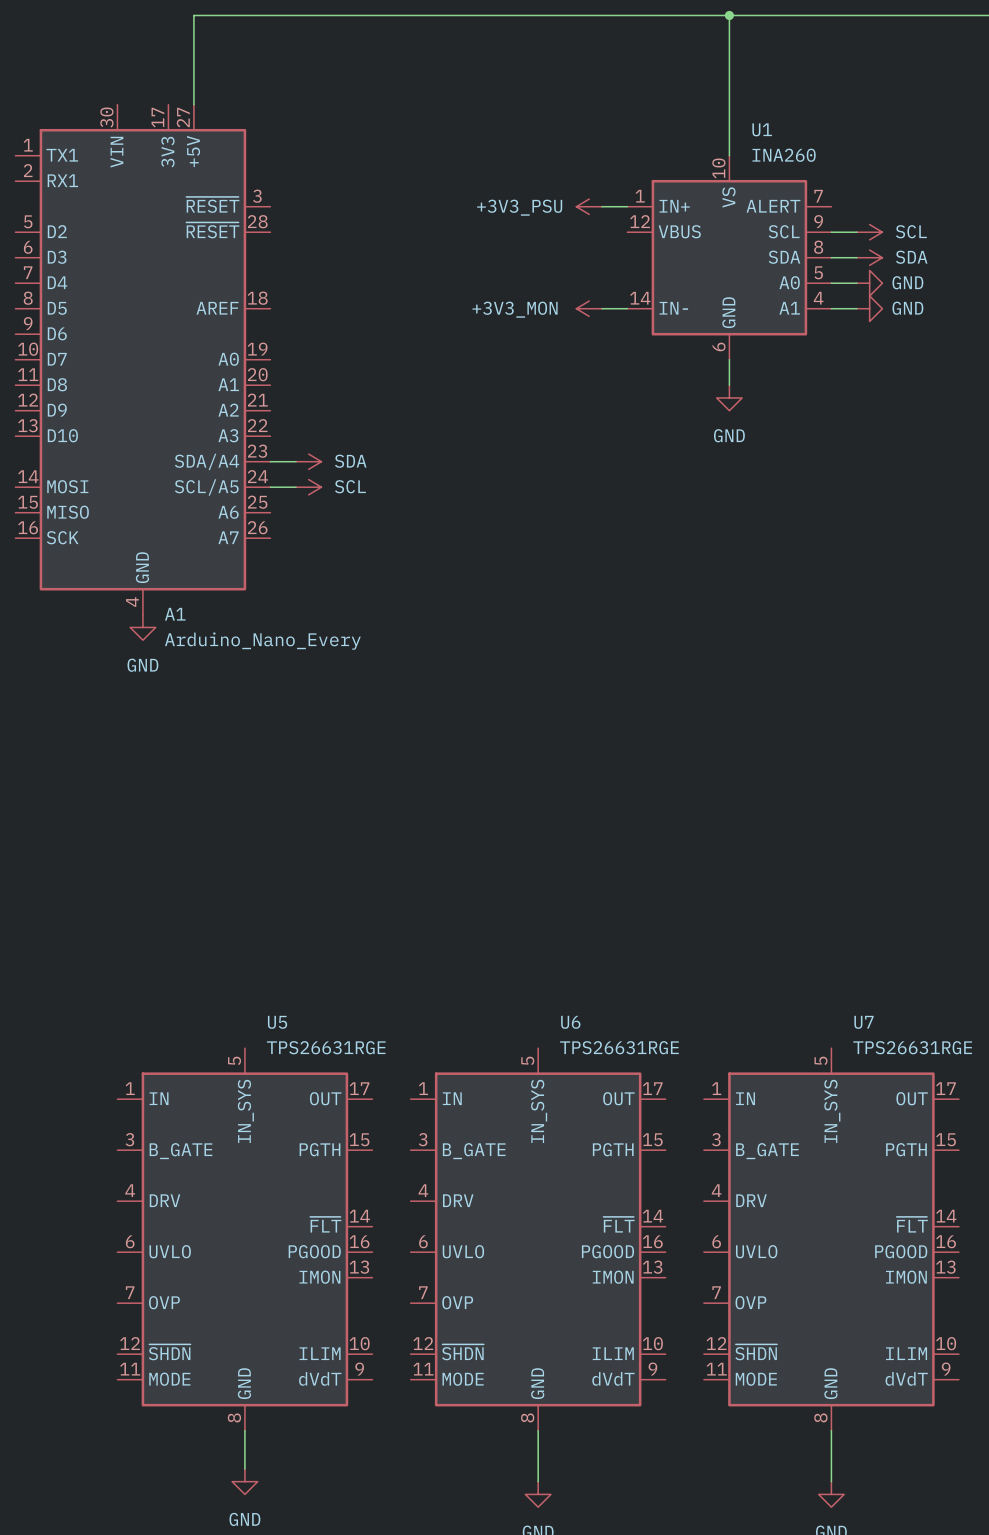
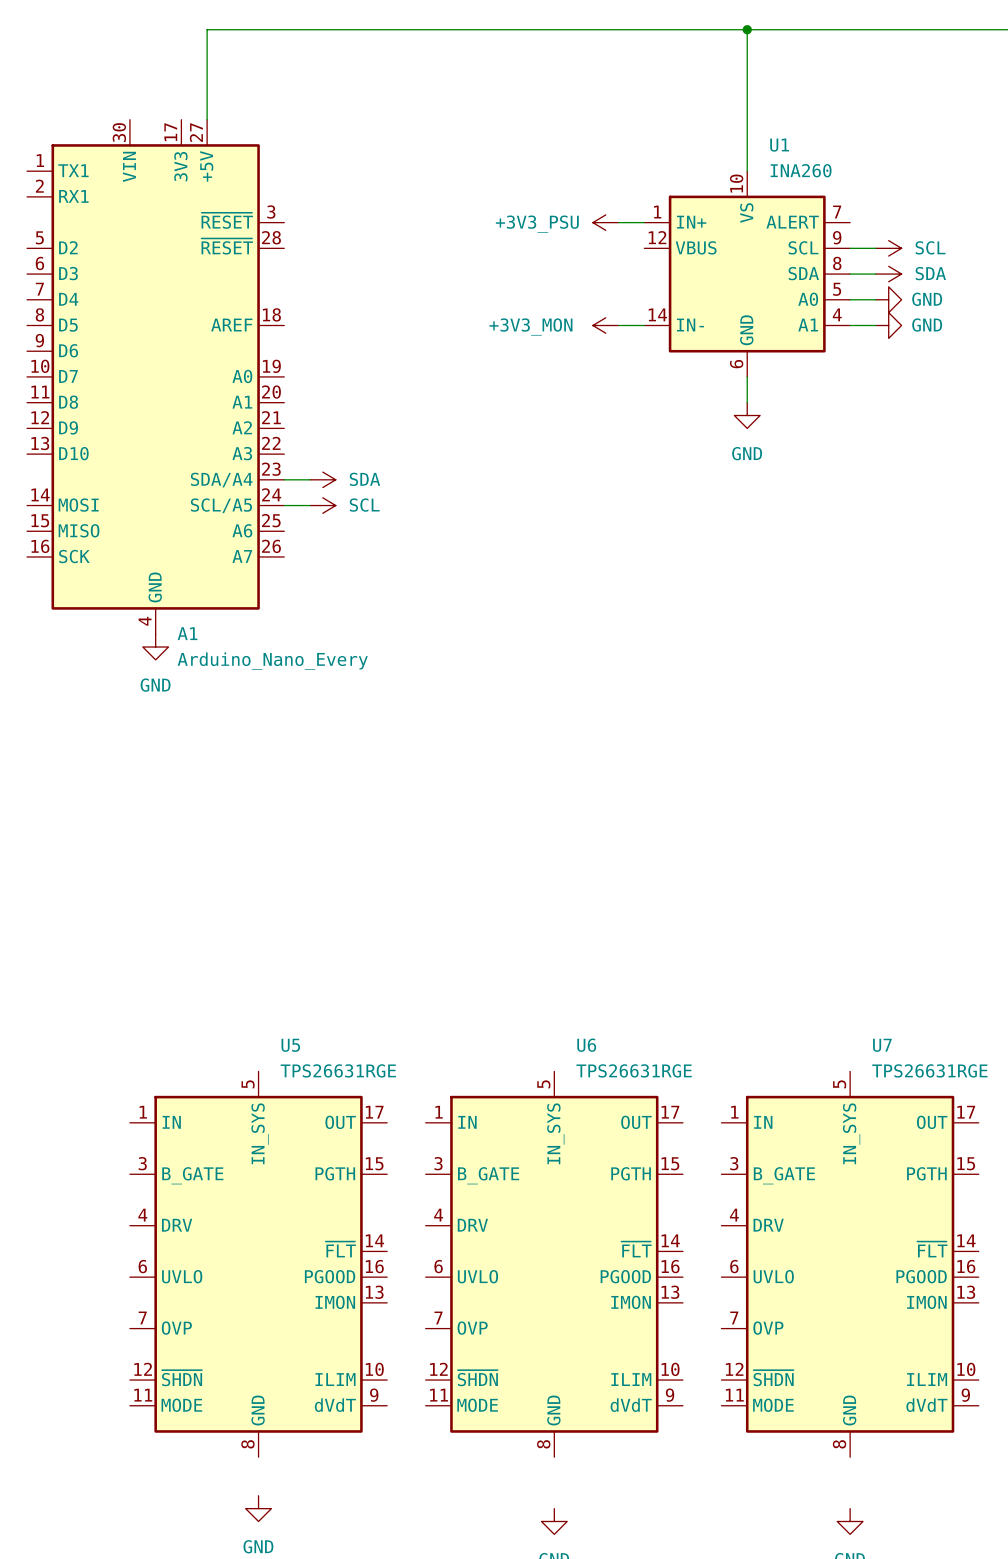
wire: (244, 1430) (244, 1468) -> none
wire: (538, 1430) (538, 1481) -> none
wire: (831, 1430) (831, 1481) -> none

